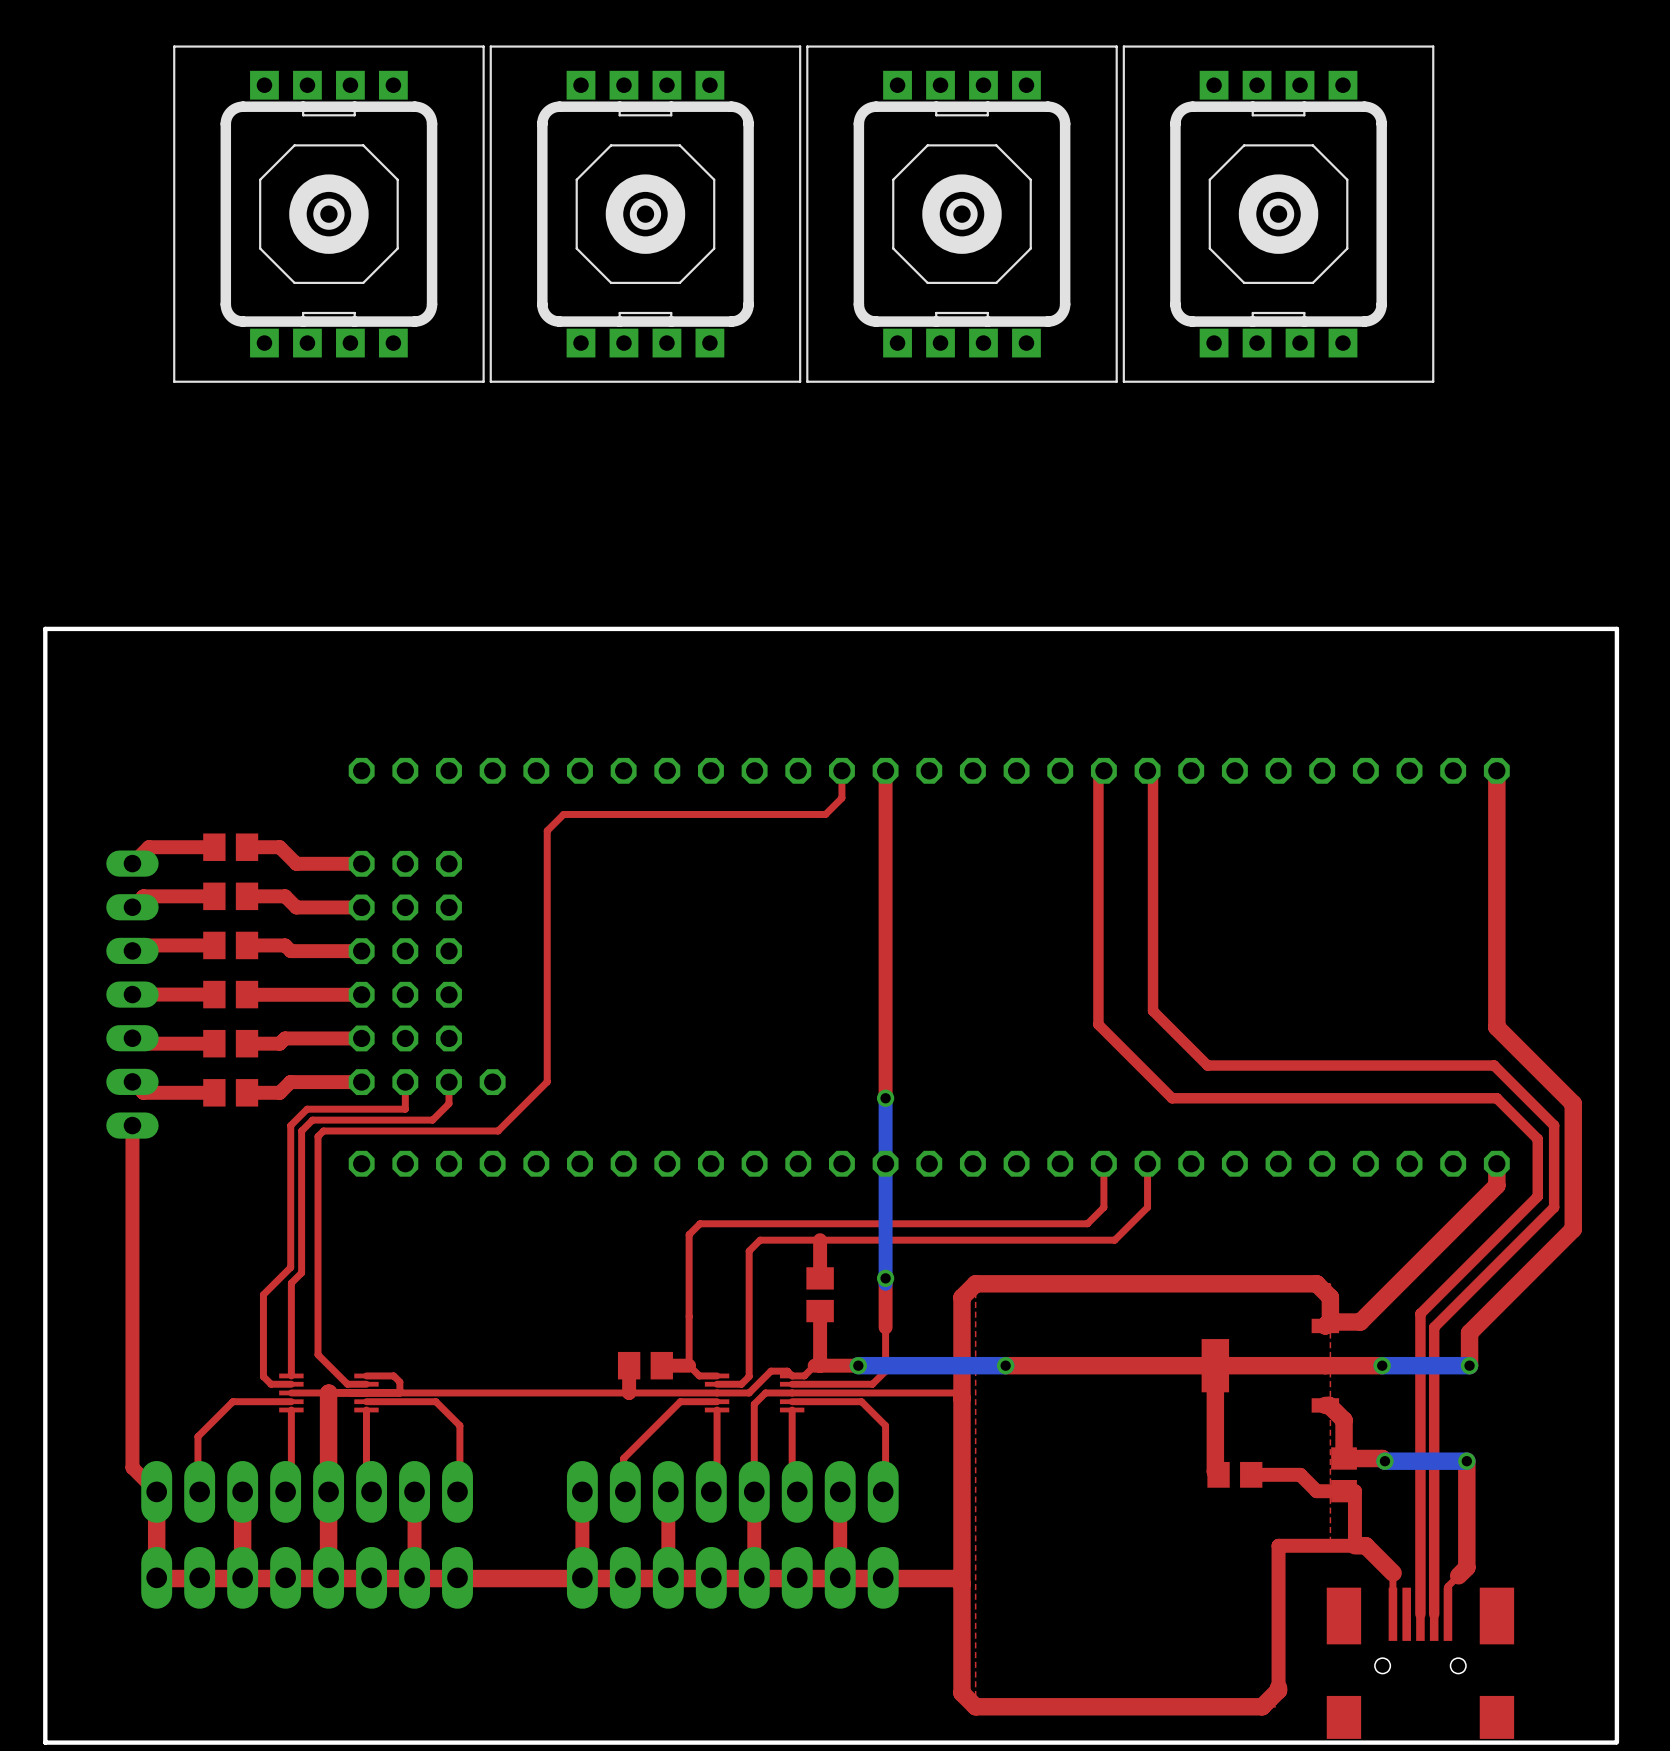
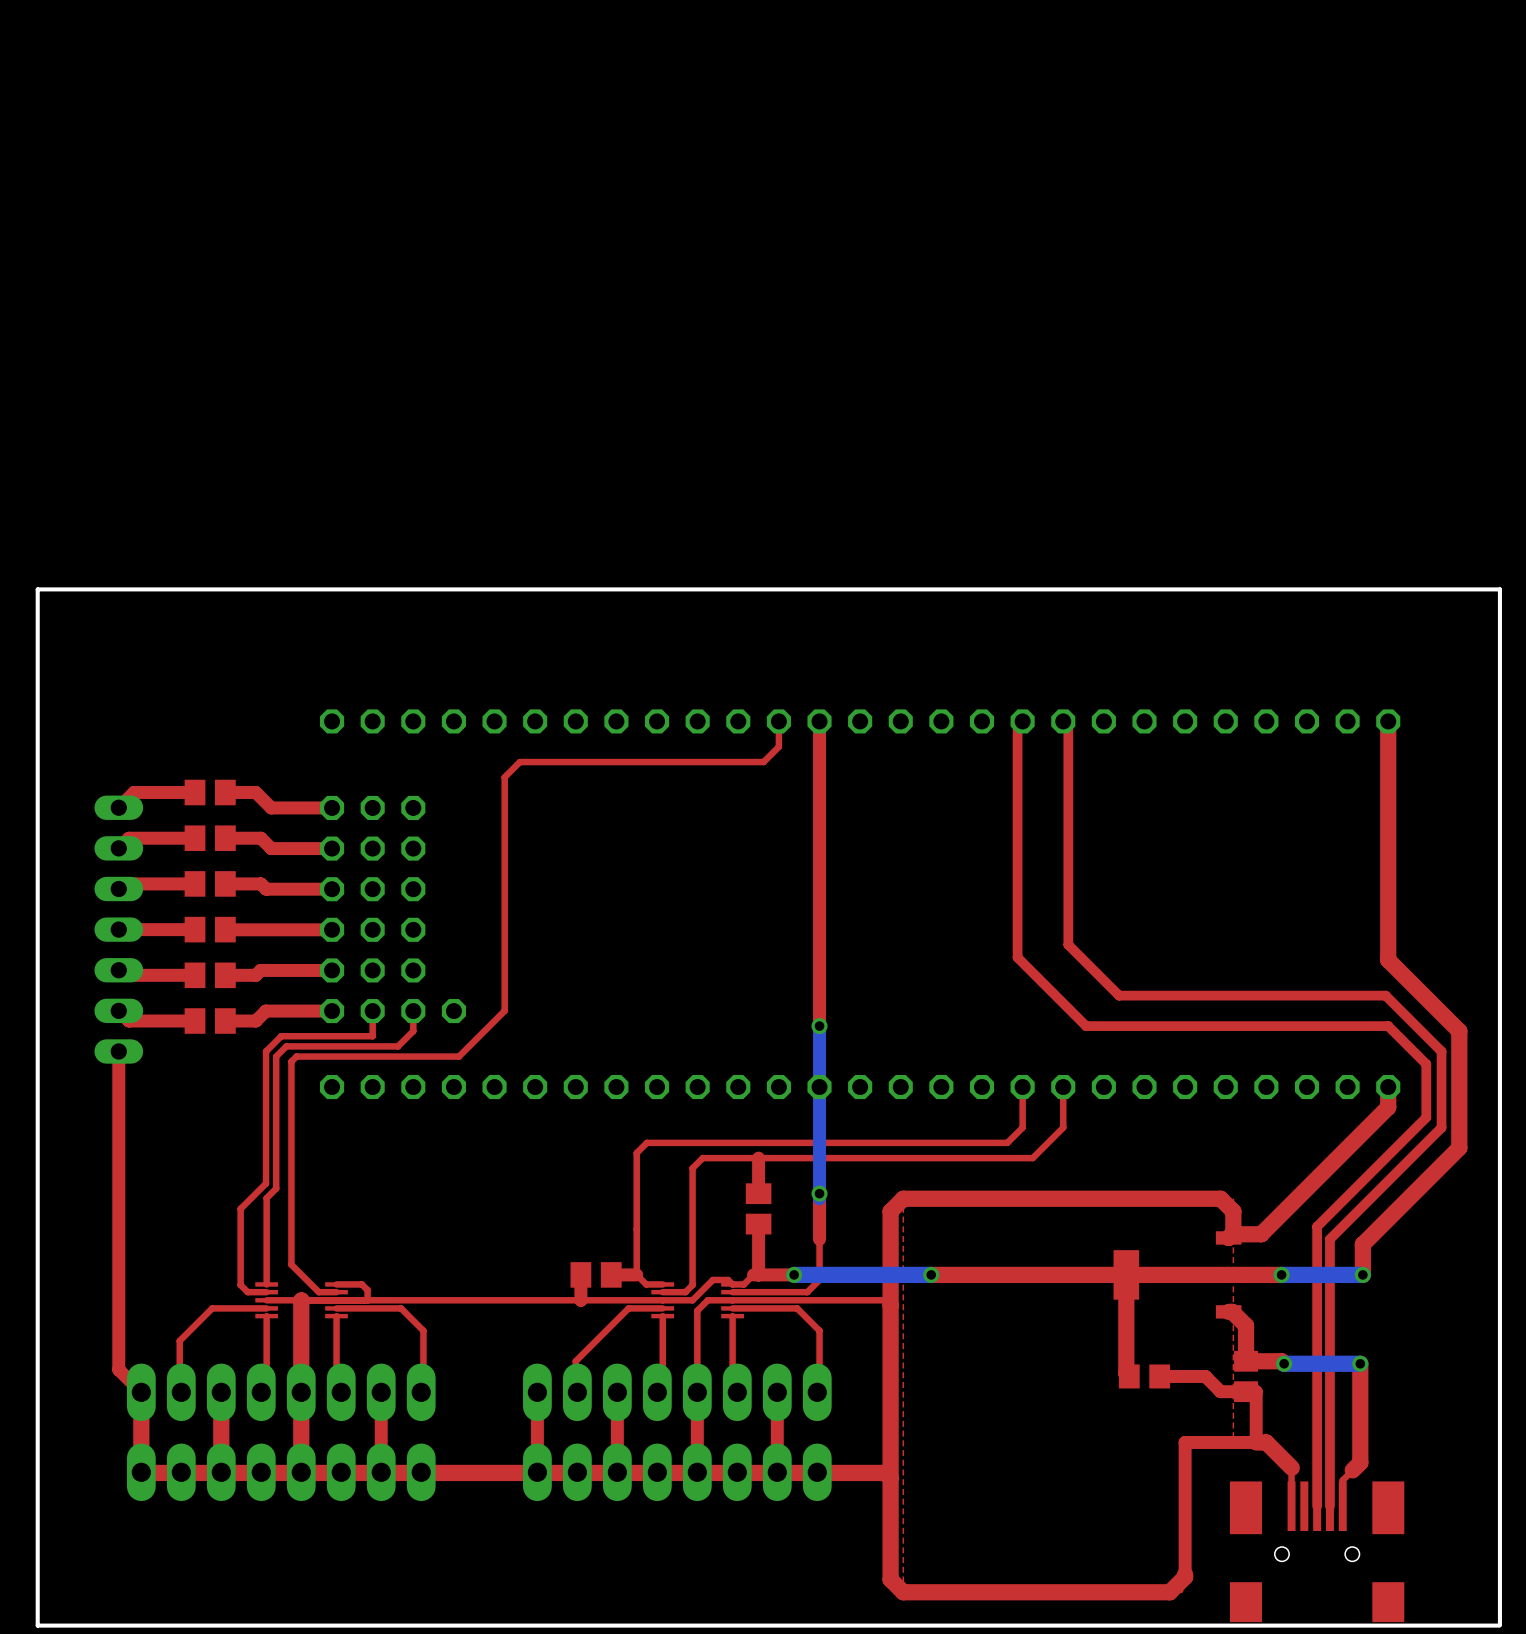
part: (328, 214) -> none
part: (645, 214) -> none
part: (962, 214) -> none
part: (1278, 214) -> none

